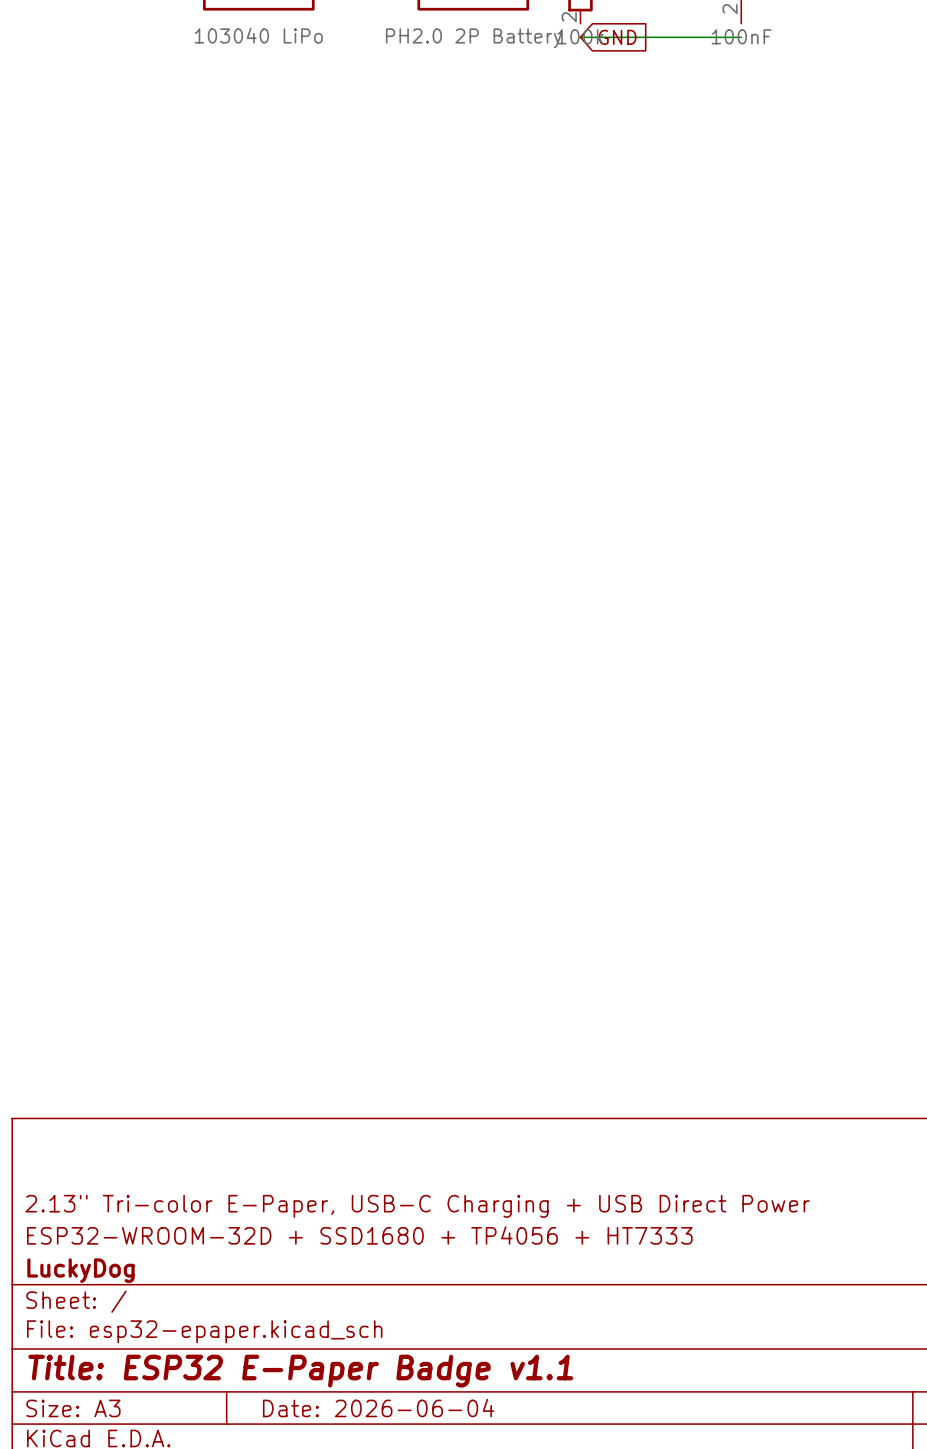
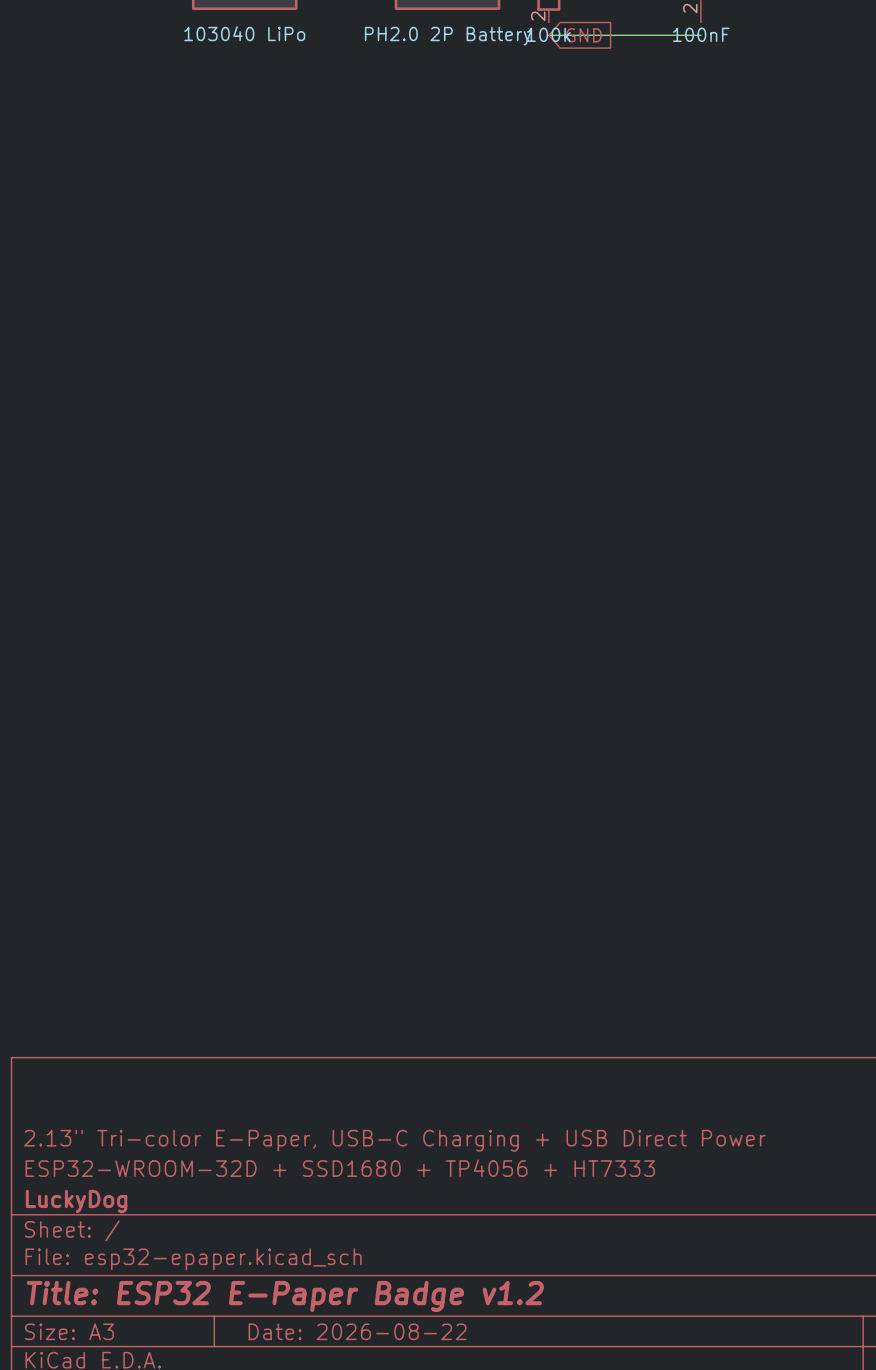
title block: Title: ESP32 E-Paper Badge v1.1 (300, 1371) -> Title: ESP32 E-Paper Badge v1.2 (285, 1296)
title block: Date: 2026-06-04 (378, 1408) -> Date: 2026-08-22 (357, 1331)

